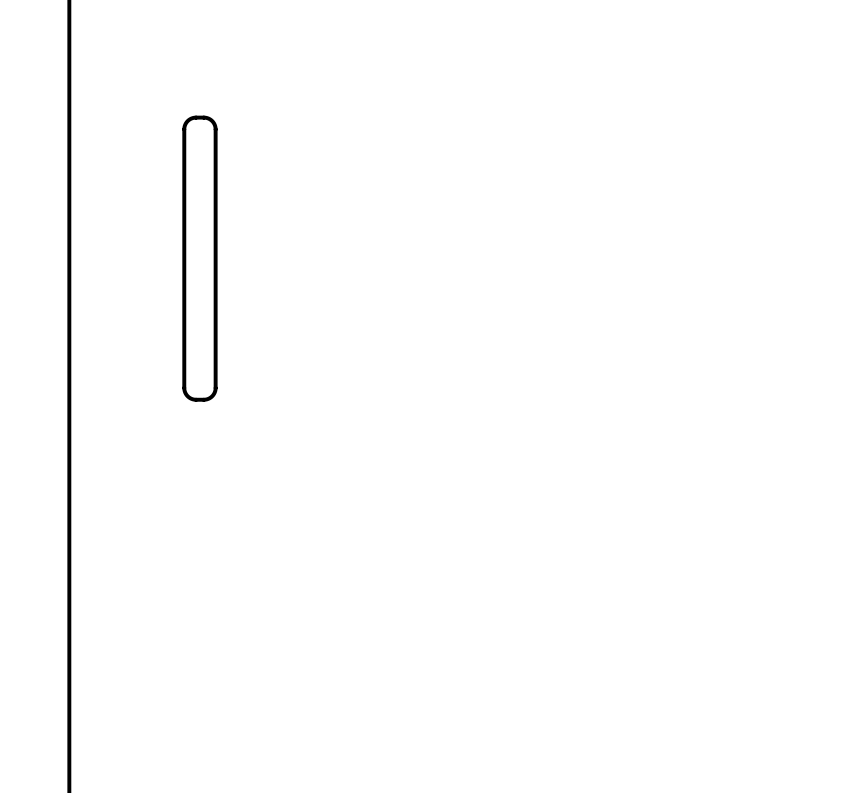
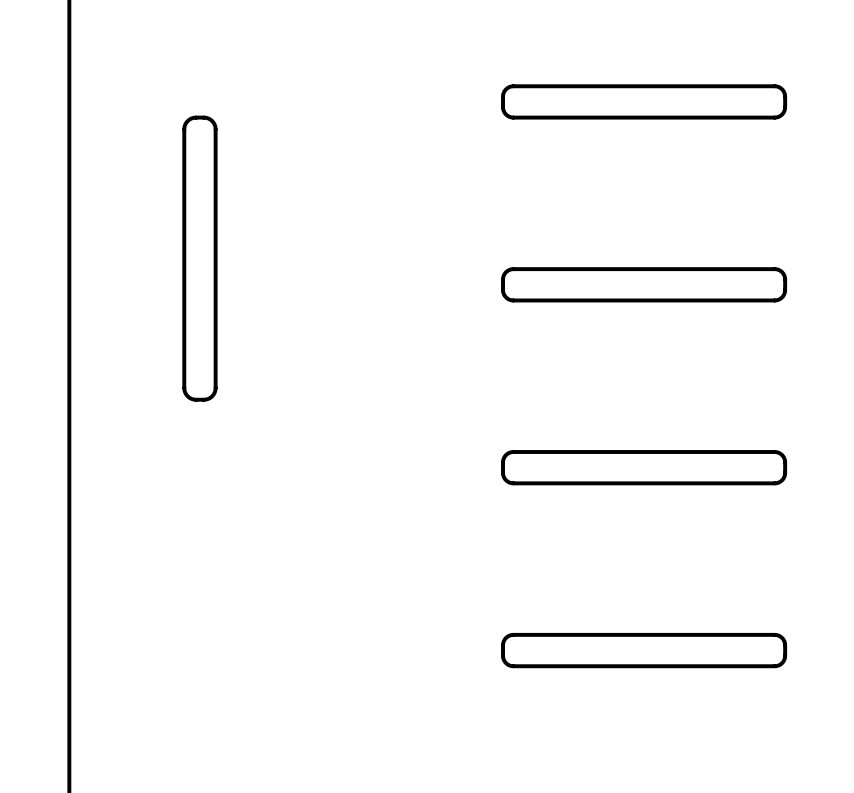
board edge: none -> (774, 86) (512, 86) (503, 92) (503, 108) (506, 114) (513, 117) (776, 117) (784, 111) (785, 96) (782, 89) (774, 86)
board edge: none -> (774, 269) (512, 269) (503, 275) (503, 291) (507, 298) (513, 300) (776, 300) (784, 294) (785, 279) (782, 272) (774, 269)
board edge: none -> (774, 452) (512, 452) (503, 458) (503, 474) (506, 480) (513, 483) (776, 483) (784, 476) (785, 462) (782, 455) (774, 452)
board edge: none -> (774, 634) (512, 634) (503, 641) (503, 657) (507, 664) (513, 666) (776, 666) (784, 659) (785, 645) (782, 637) (774, 634)

